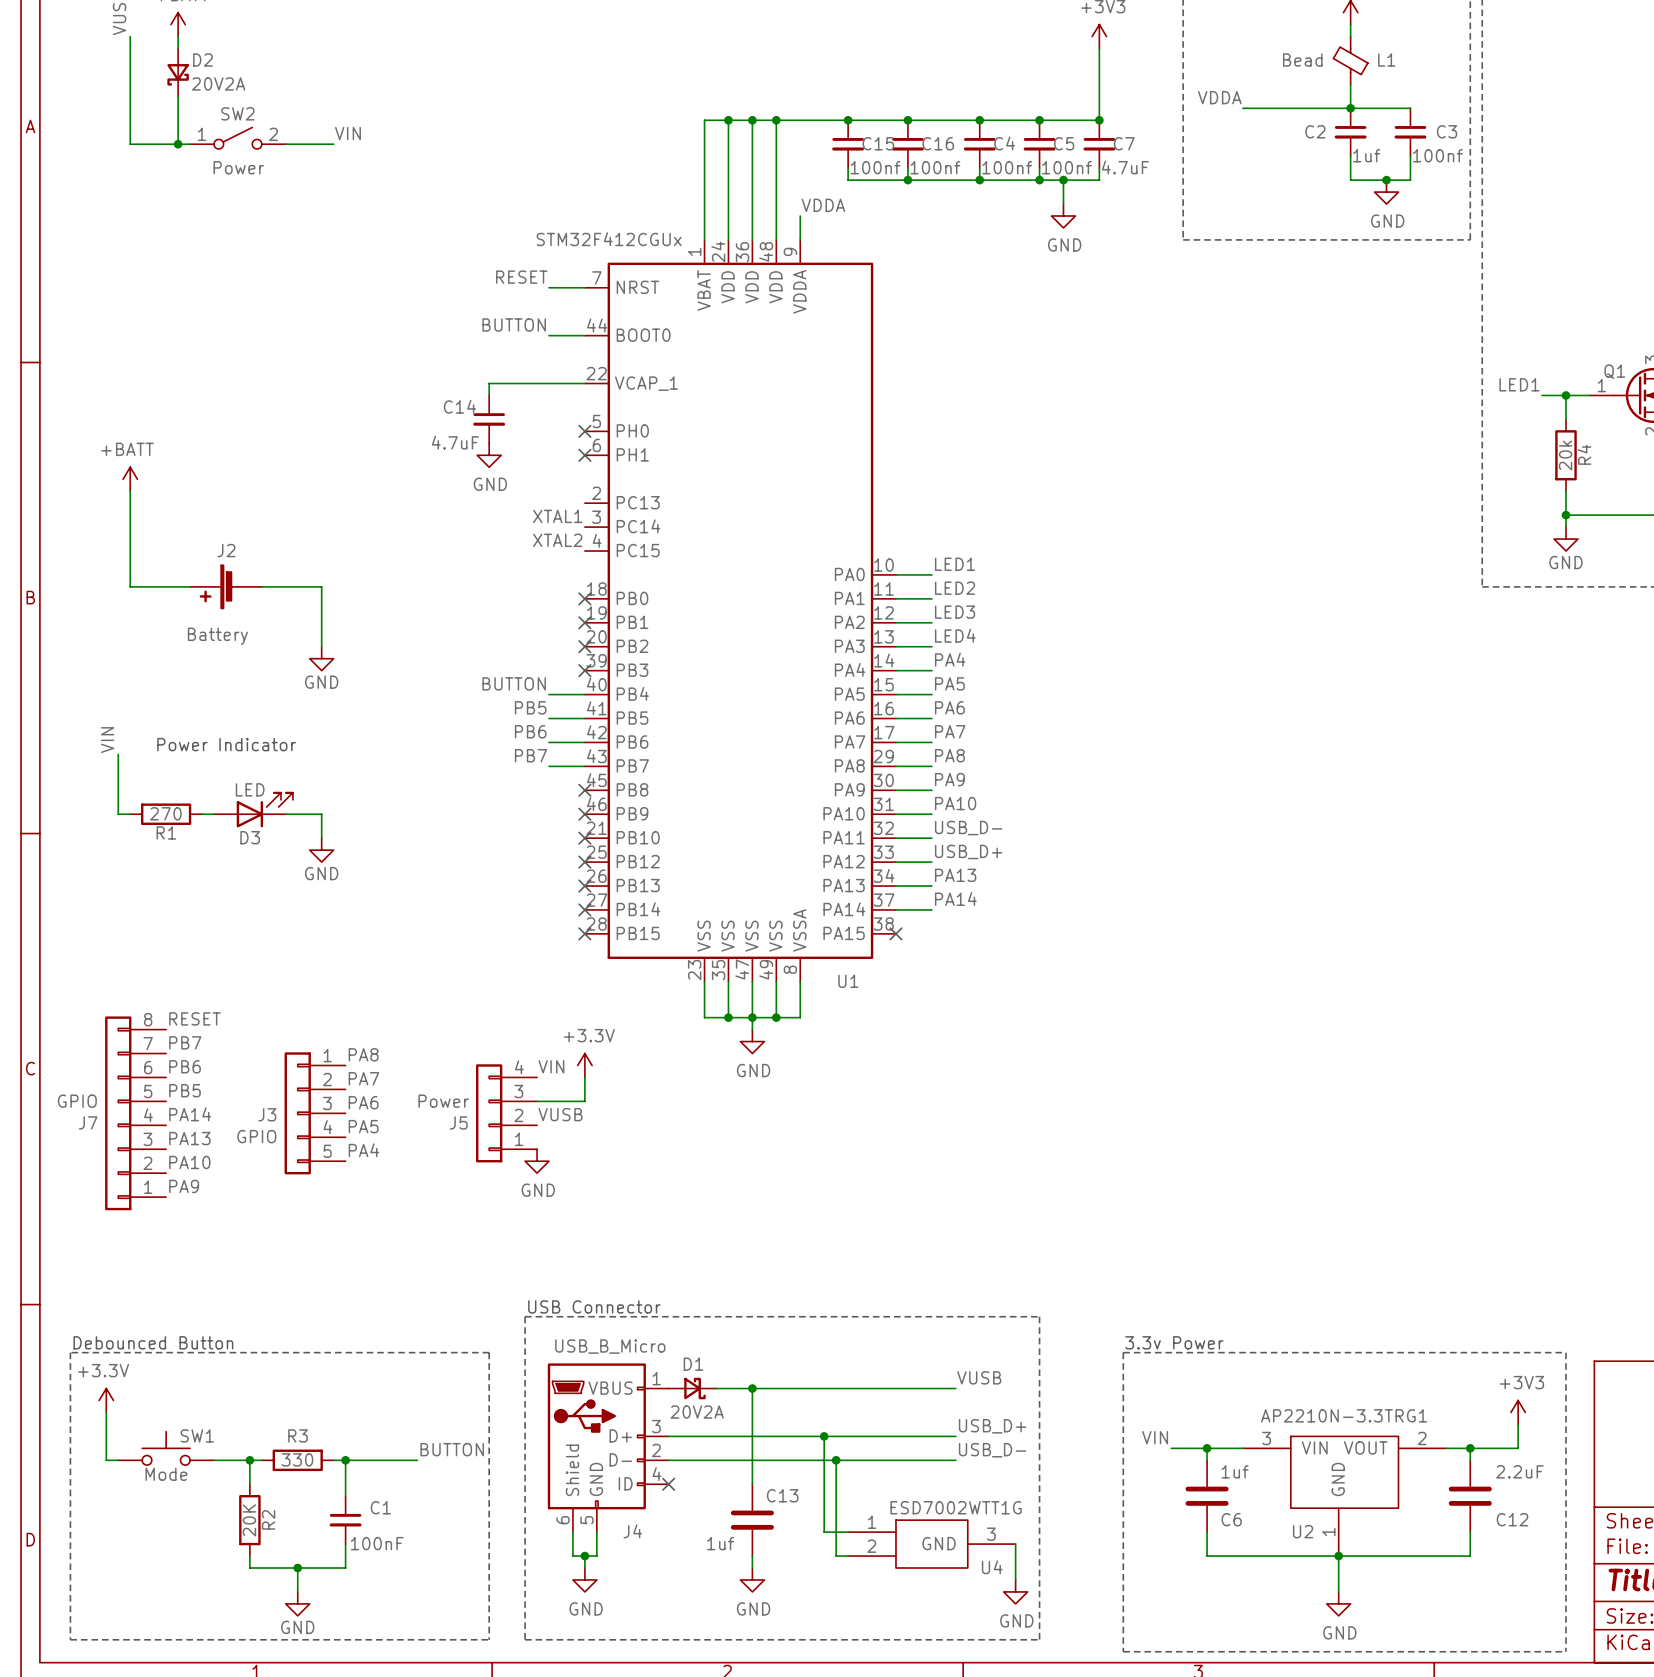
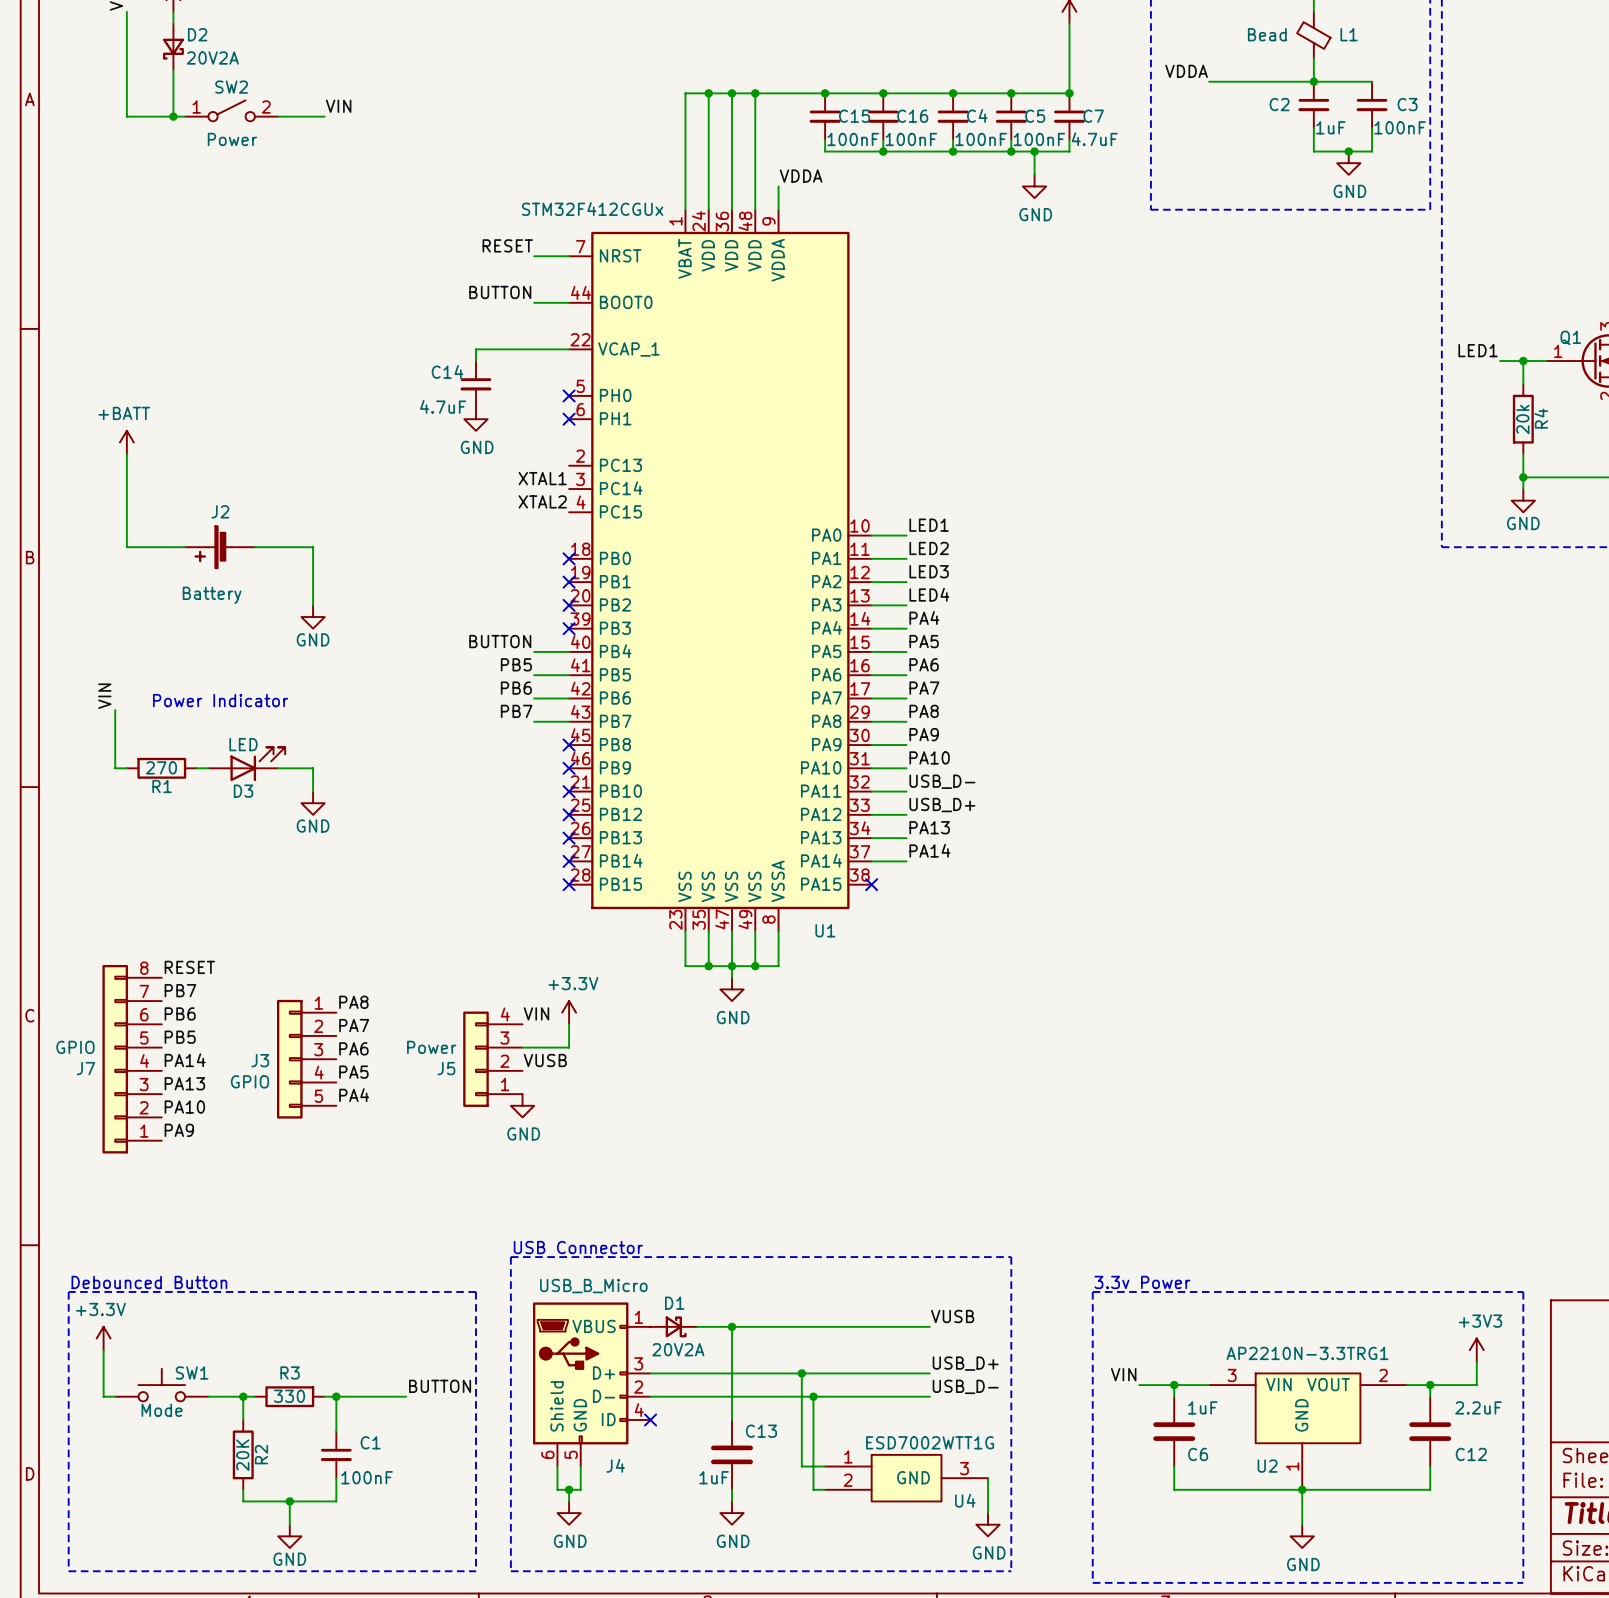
C2 value: 1uf (1366, 155) -> 1uF (1330, 127)
C3 value: 100nf (1437, 155) -> 100nF (1400, 127)
C15 value: 100nf (875, 167) -> 100nF (853, 139)
C16 value: 100nf (935, 167) -> 100nF (911, 139)
C4 value: 100nf (1007, 167) -> 100nF (981, 139)
C5 value: 100nf (1066, 167) -> 100nF (1039, 139)
C6 value: 1uf (1235, 1471) -> 1uF (1202, 1407)
C13 value: 1uf (720, 1543) -> 1uF (714, 1477)

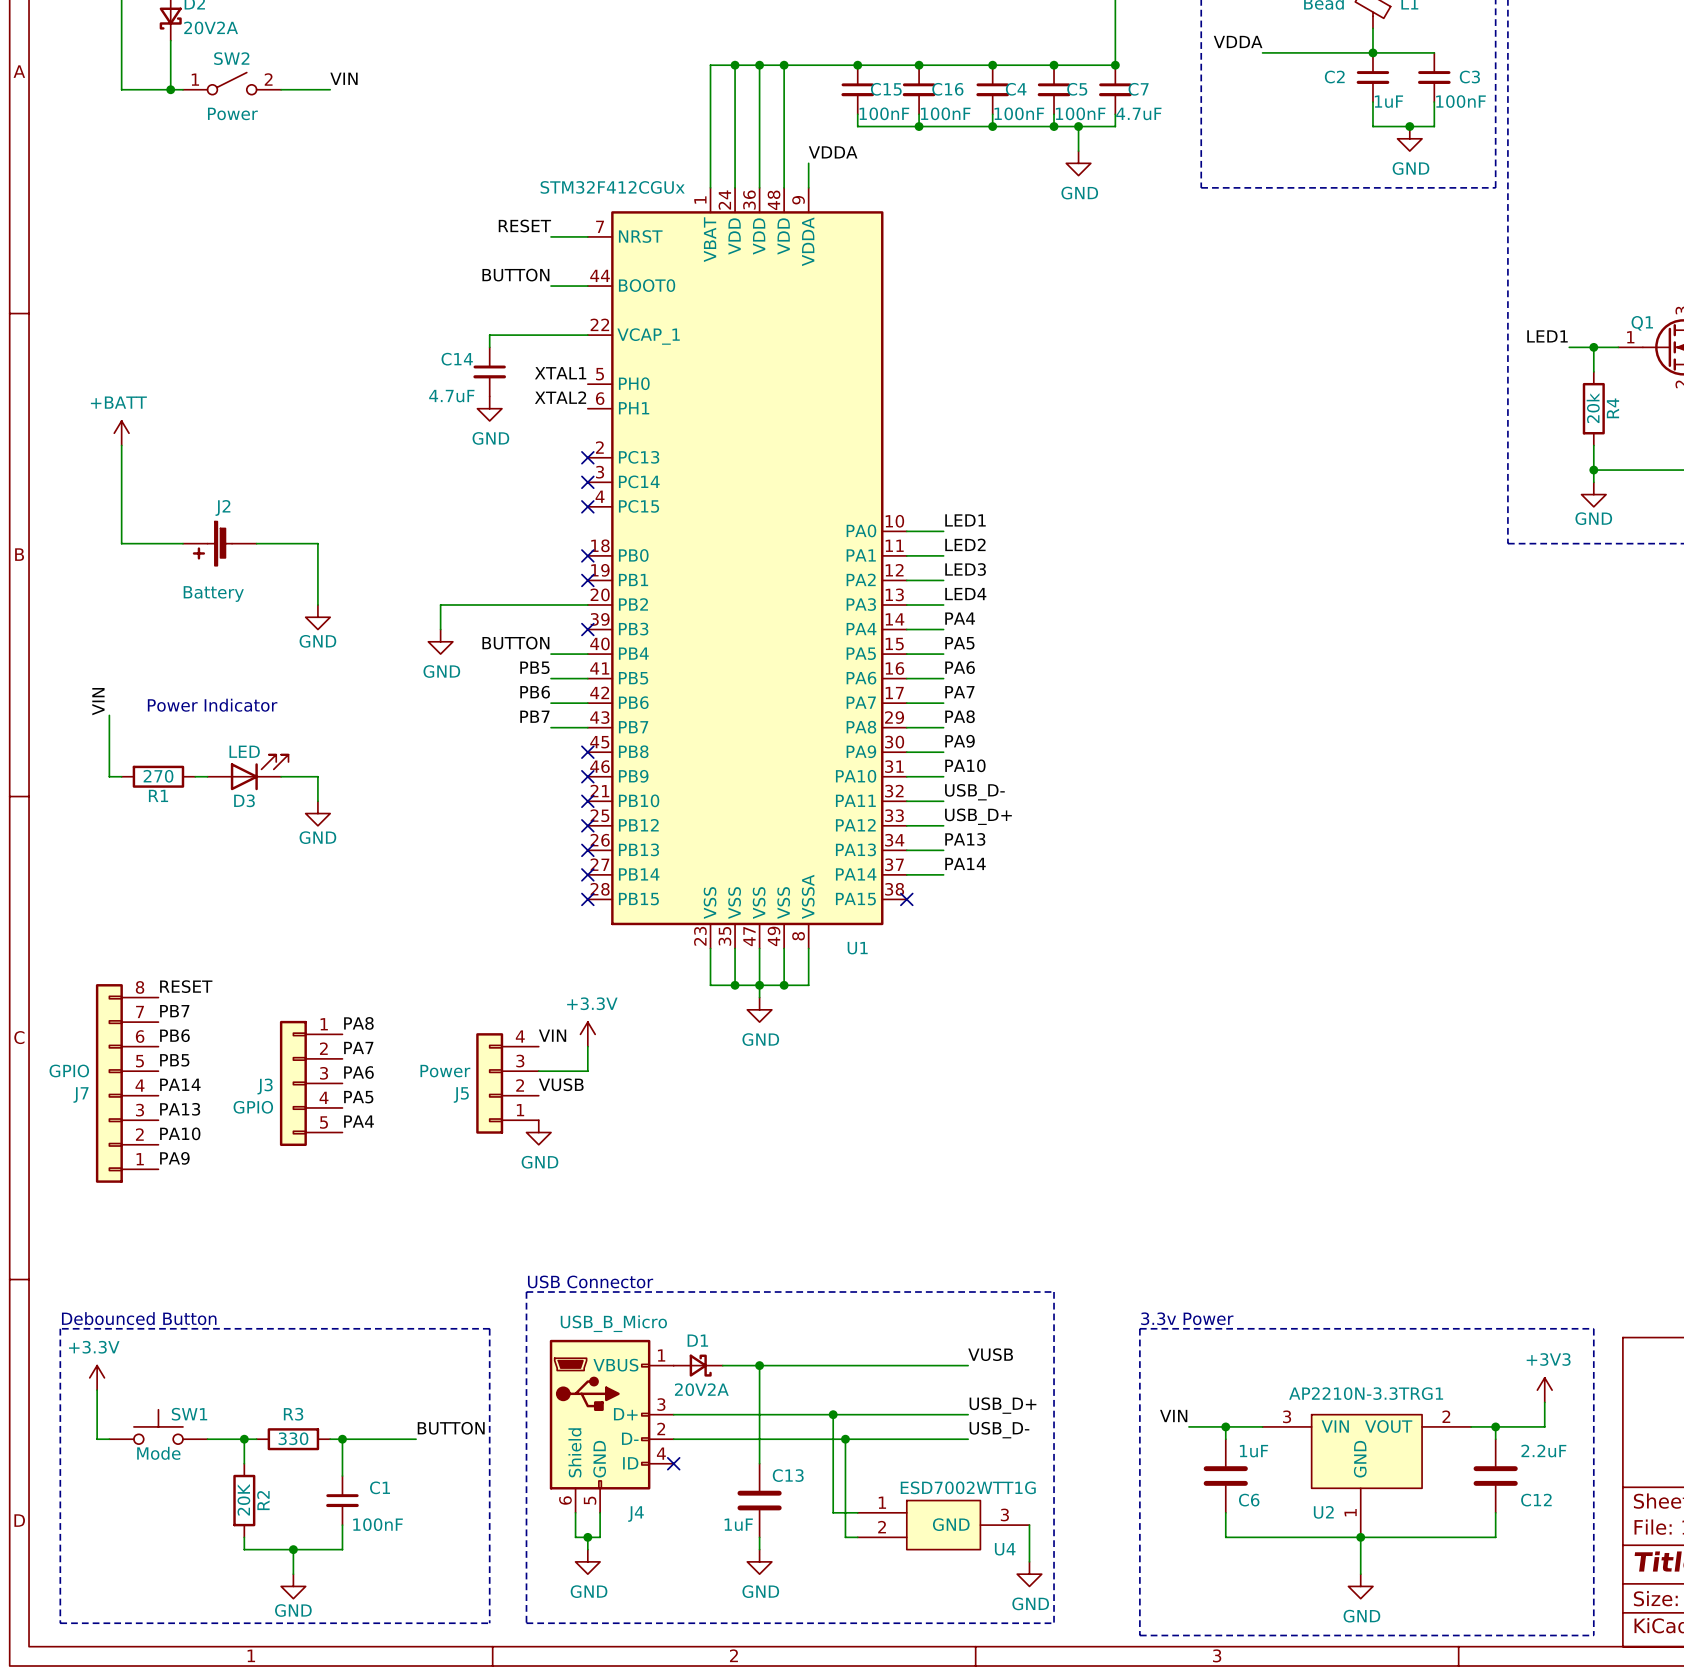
no-connect mark: (569, 395) -> none
no-connect mark: (569, 419) -> none
no-connect mark: none -> (587, 457)
label position: XTAL1 (542, 478) -> XTAL1 (560, 373)
no-connect mark: none -> (587, 482)
label position: XTAL2 (542, 501) -> XTAL2 (560, 397)
no-connect mark: none -> (587, 506)
wire: none -> (587, 604) (440, 604) (440, 629)
no-connect mark: (569, 605) -> none
power symbol: none -> GND (440, 641)

